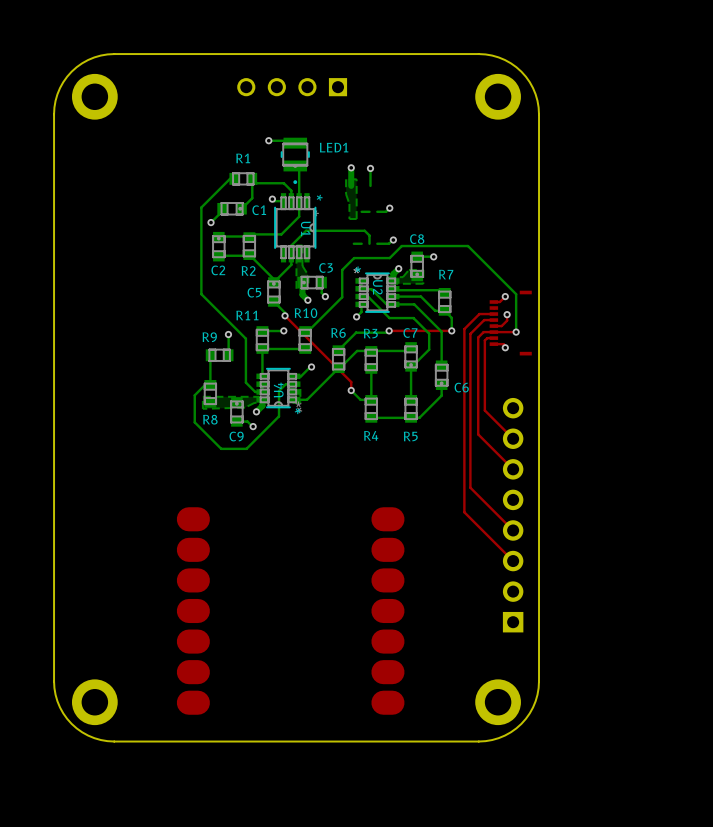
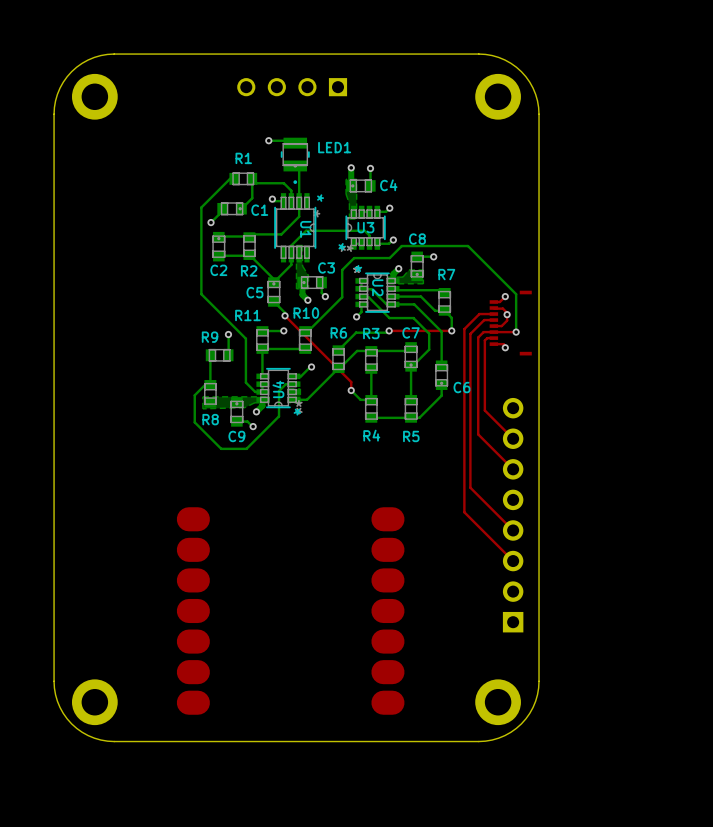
C4: none -> (360, 185)
U3: none -> (365, 227)
top track: none -> (494, 308) (502, 308) (507, 312)

